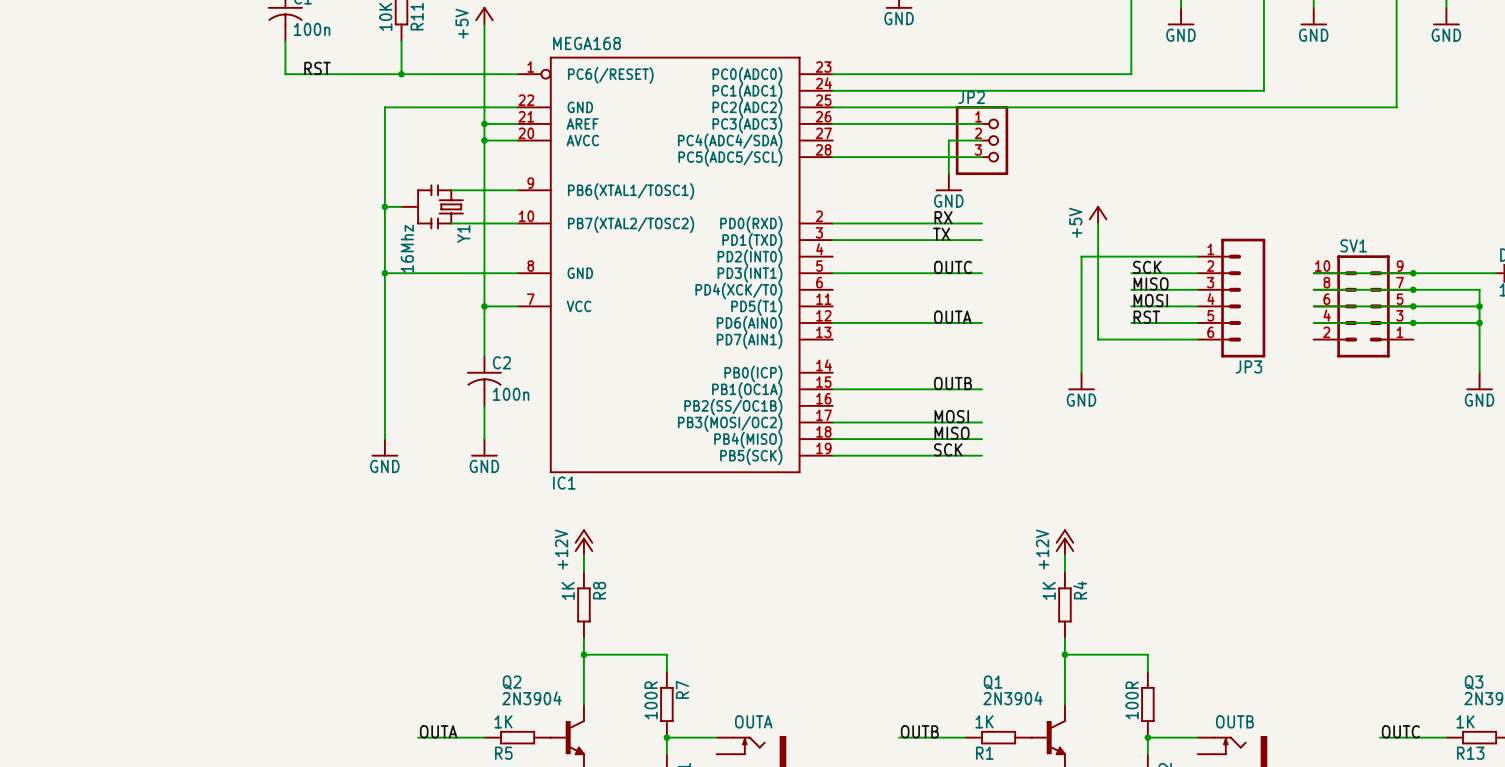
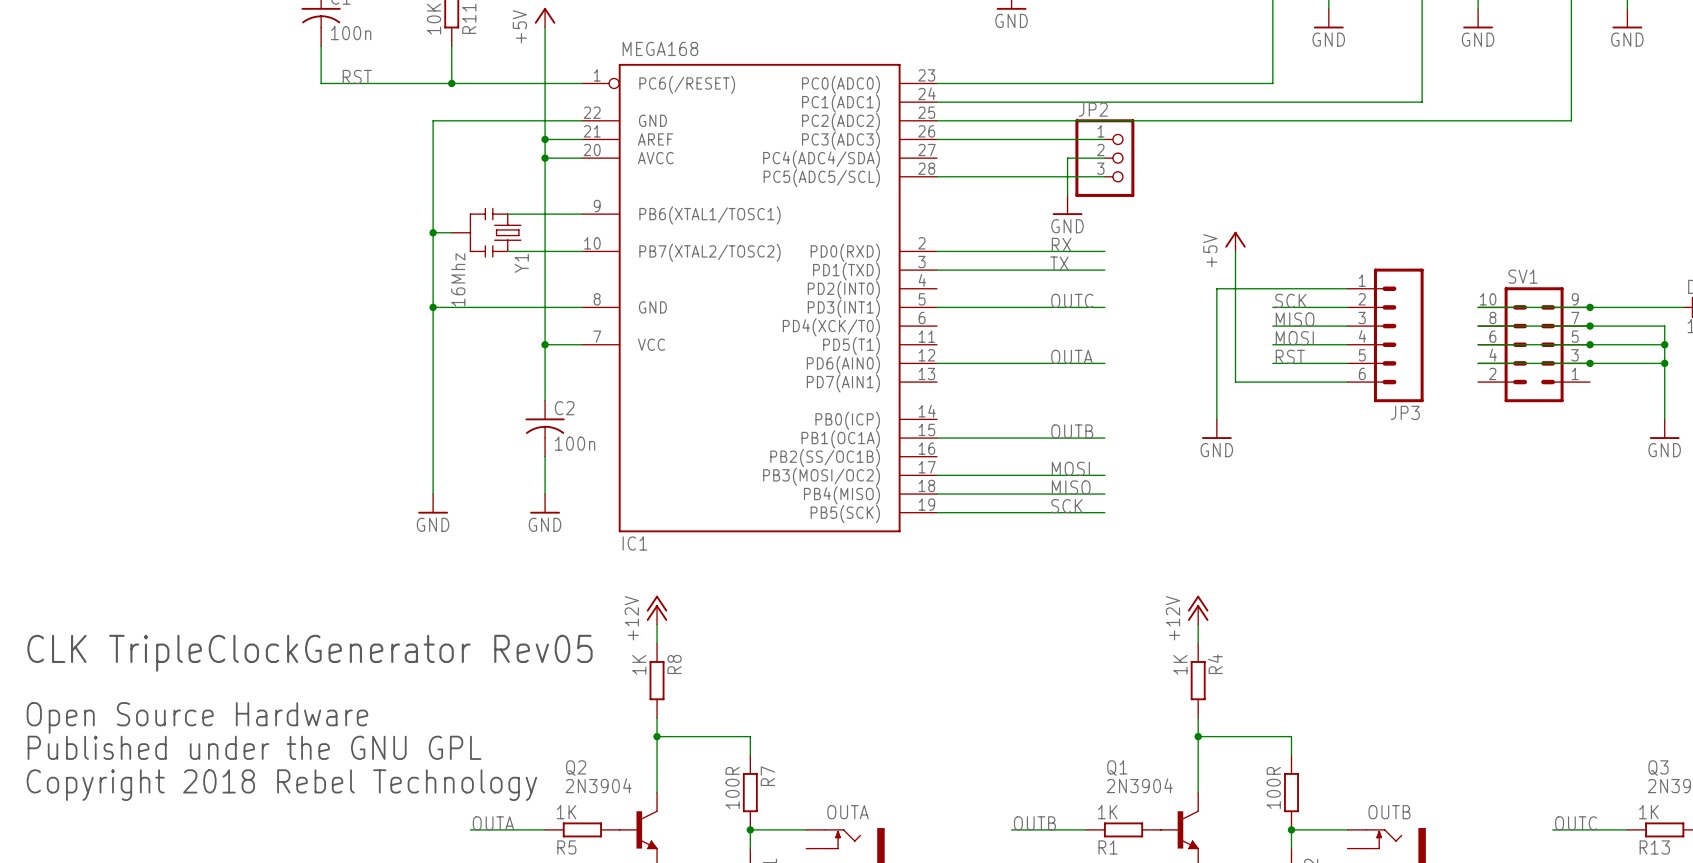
text: none -> CLK TripleClockGenerator Rev05 (310, 653)
text: none -> Open Source Hardware (197, 717)
text: none -> Published under the GNU GPL (254, 747)
text: none -> Copyright 2018 Rebel Technology (281, 785)

